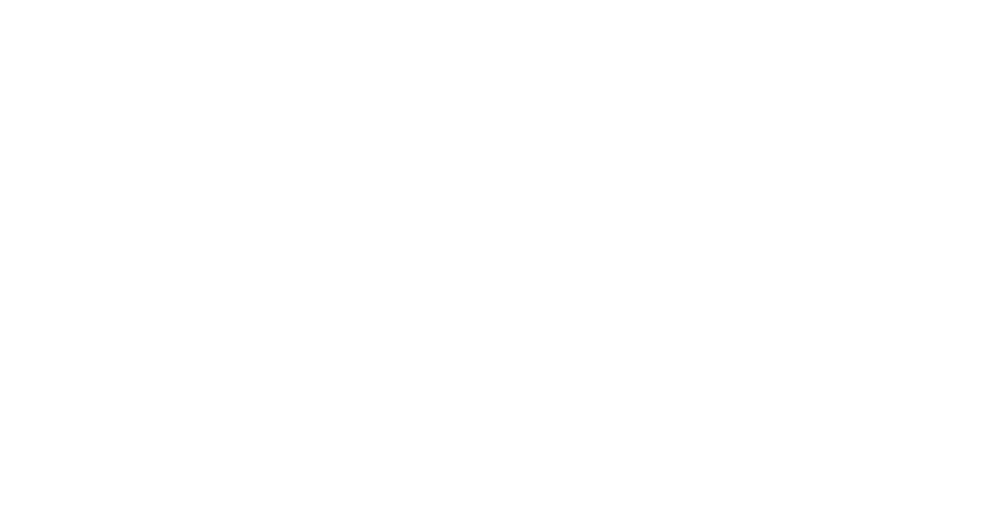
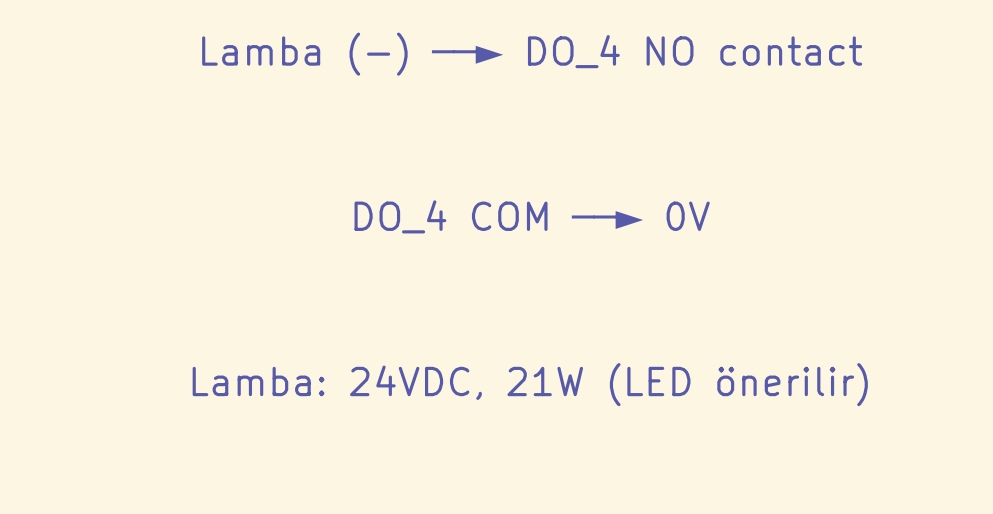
text: none -> Lamba (-) ──► DO_4 NO contact (532, 54)
text: none -> DO_4 COM ──► 0V (532, 216)
text: none -> Lamba: 24VDC, 21W (LED önerilir) (530, 384)

